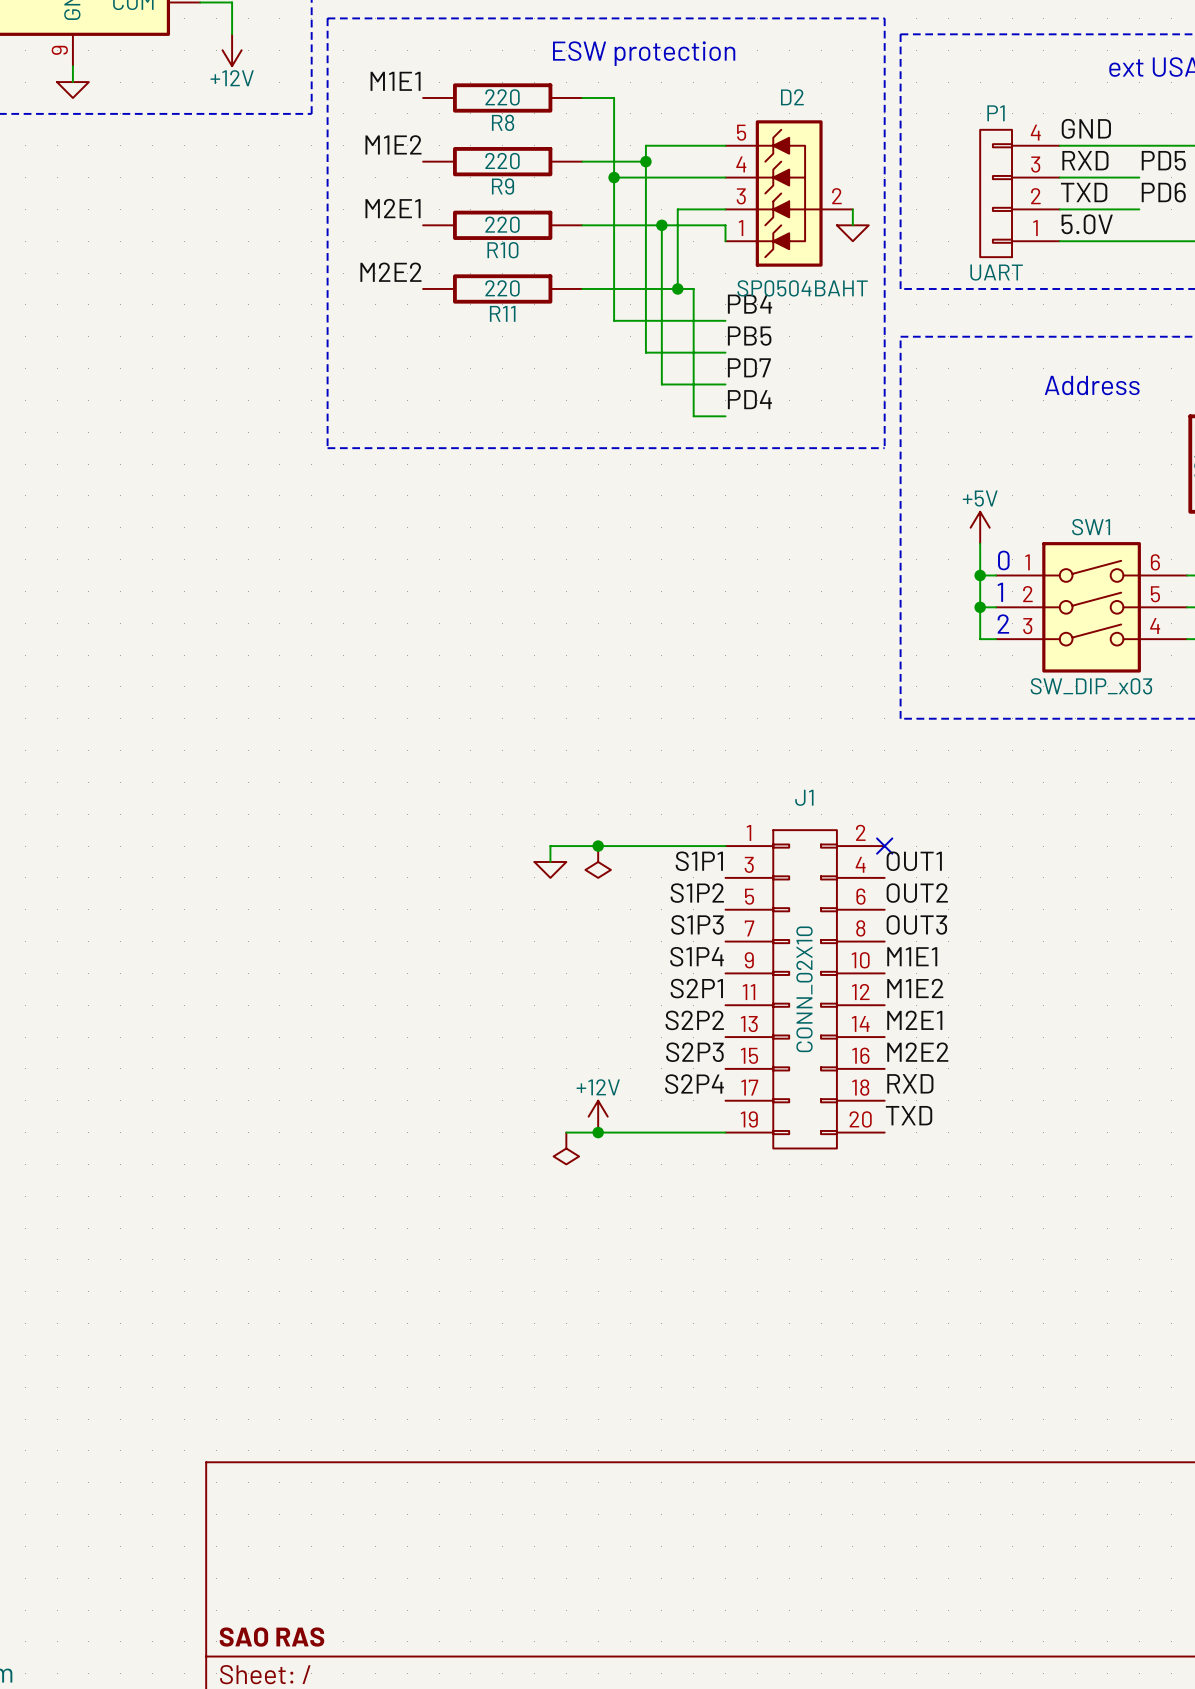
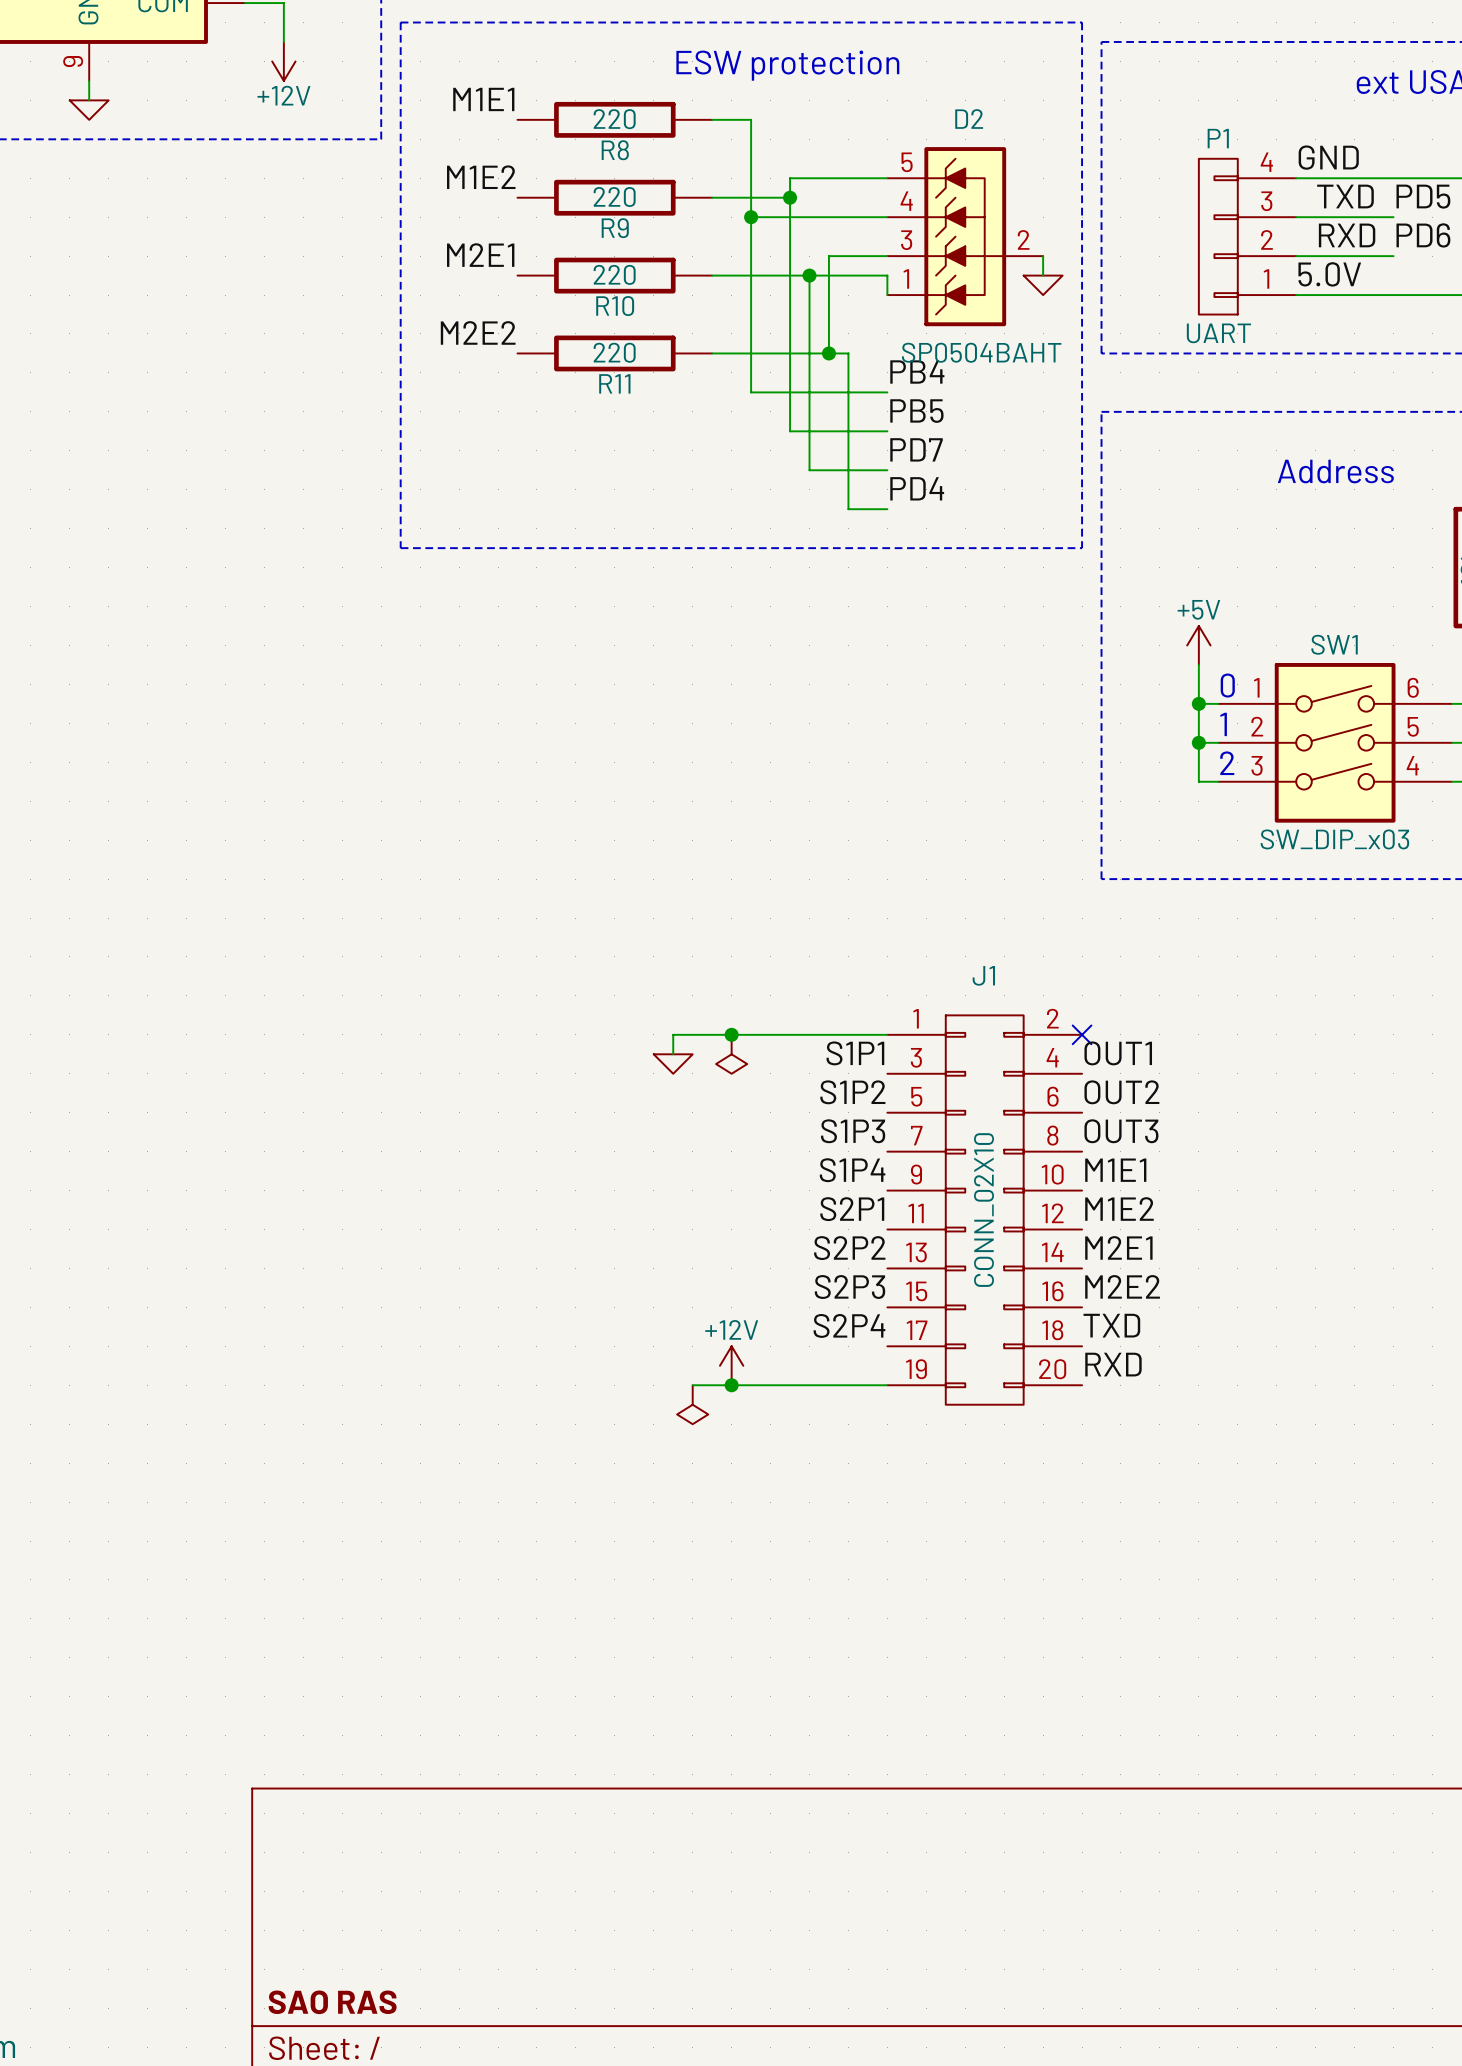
label position: RXD (1085, 160) -> RXD (1347, 235)
label position: TXD (1084, 192) -> TXD (1345, 196)
label: RXD (910, 1083) -> TXD (1111, 1325)
label: TXD (909, 1115) -> RXD (1113, 1364)

